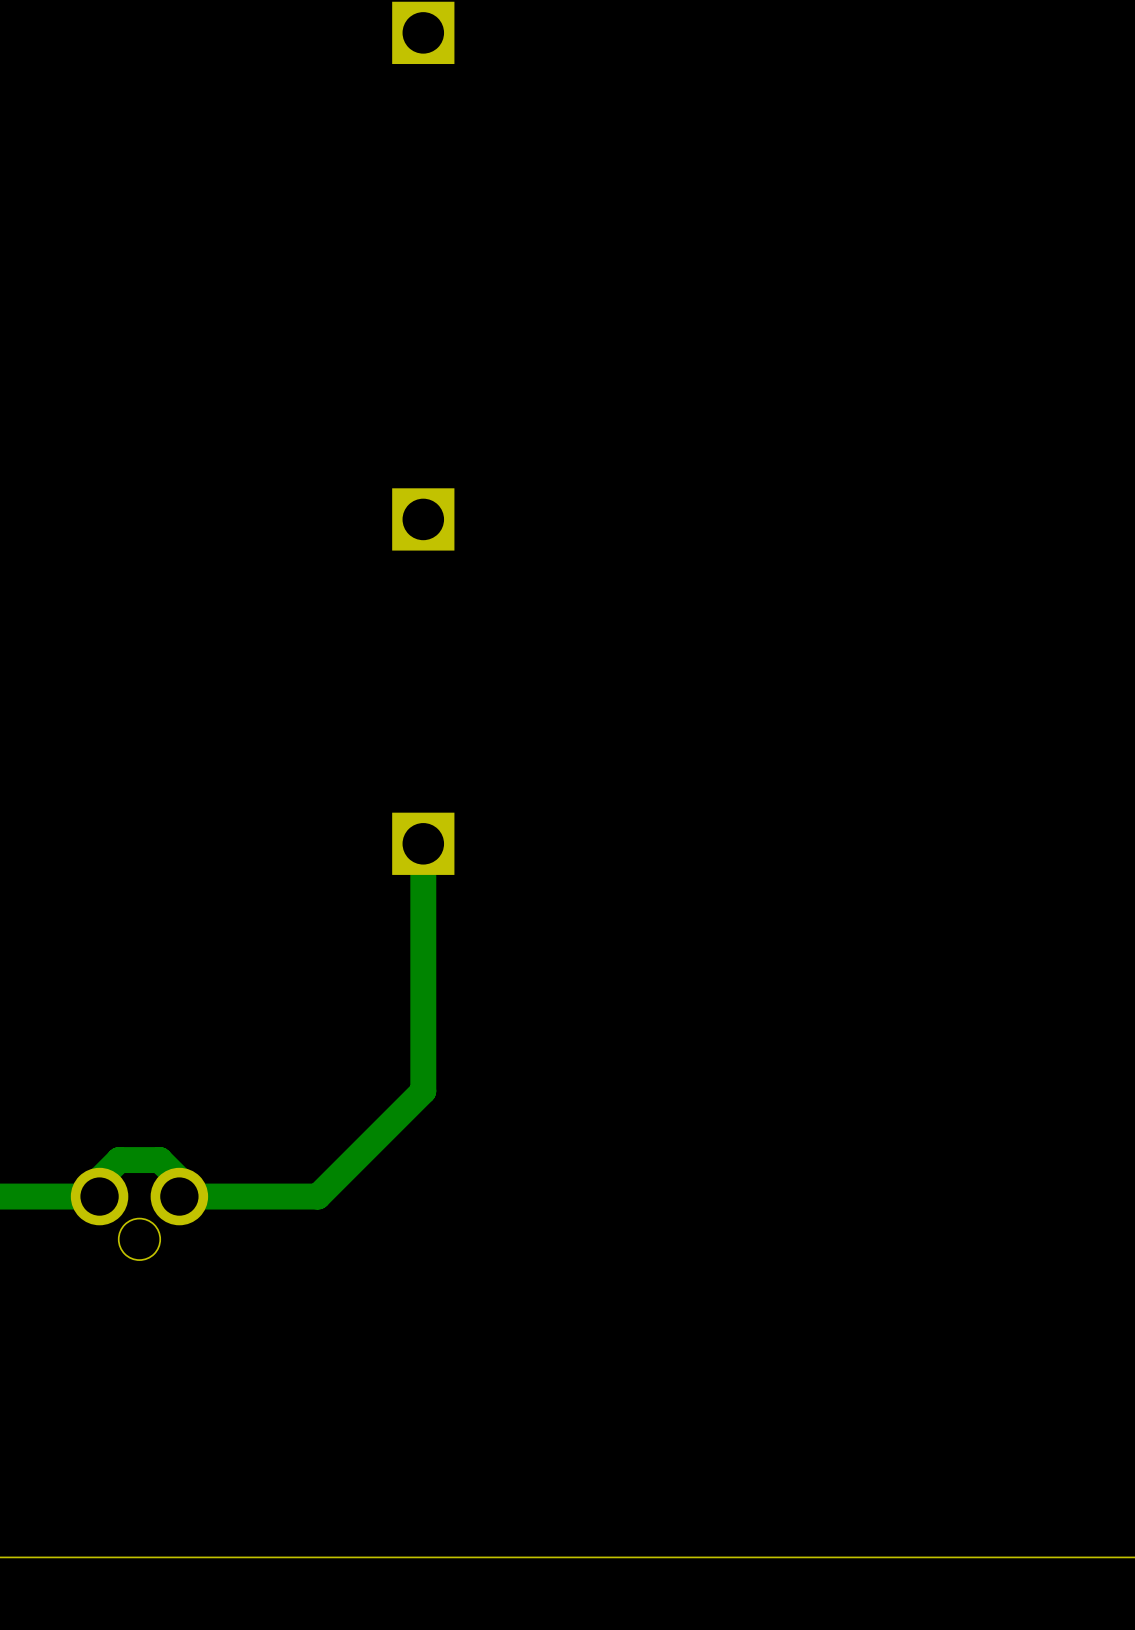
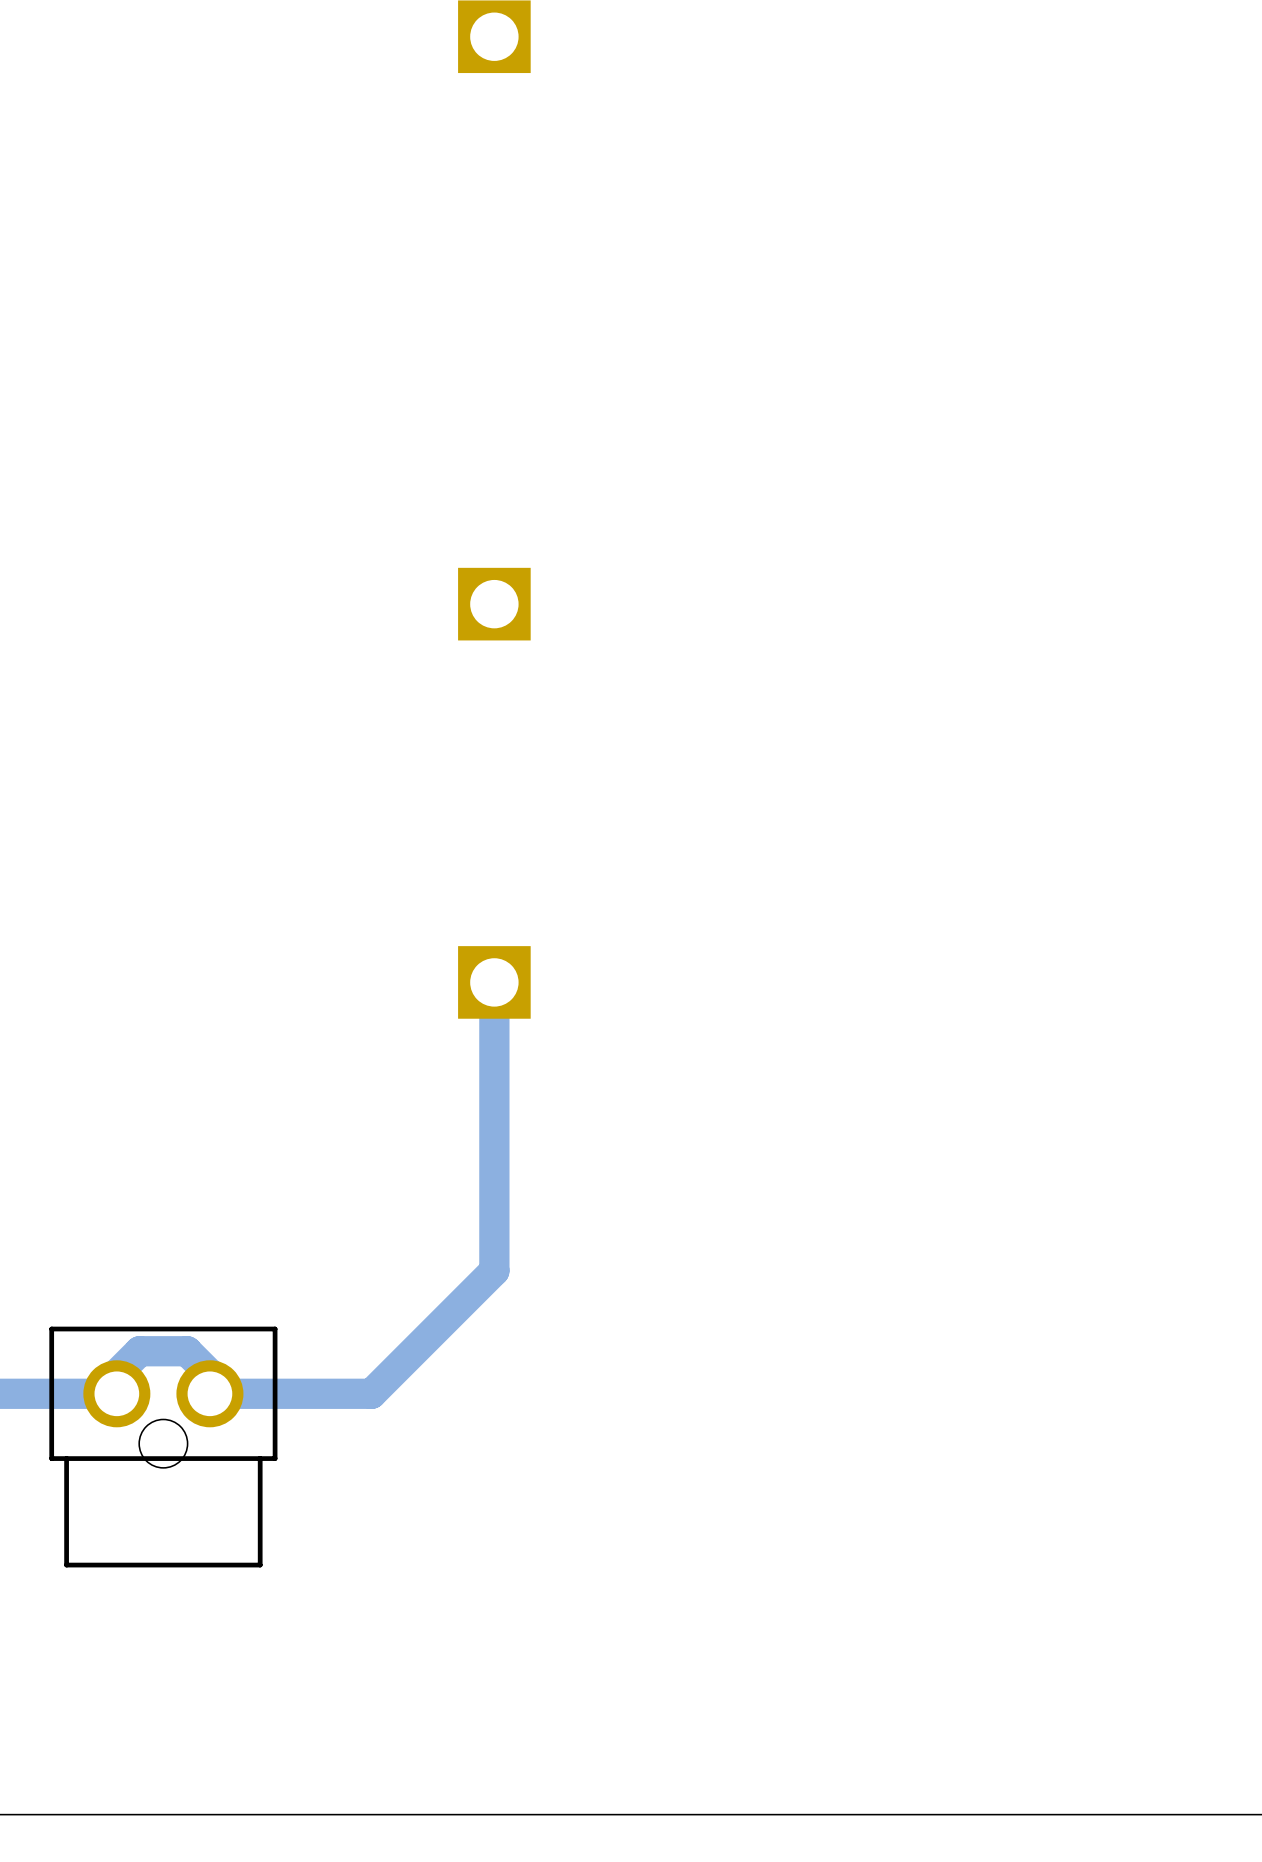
part side: top (139, 1213) -> bottom (163, 1447)

